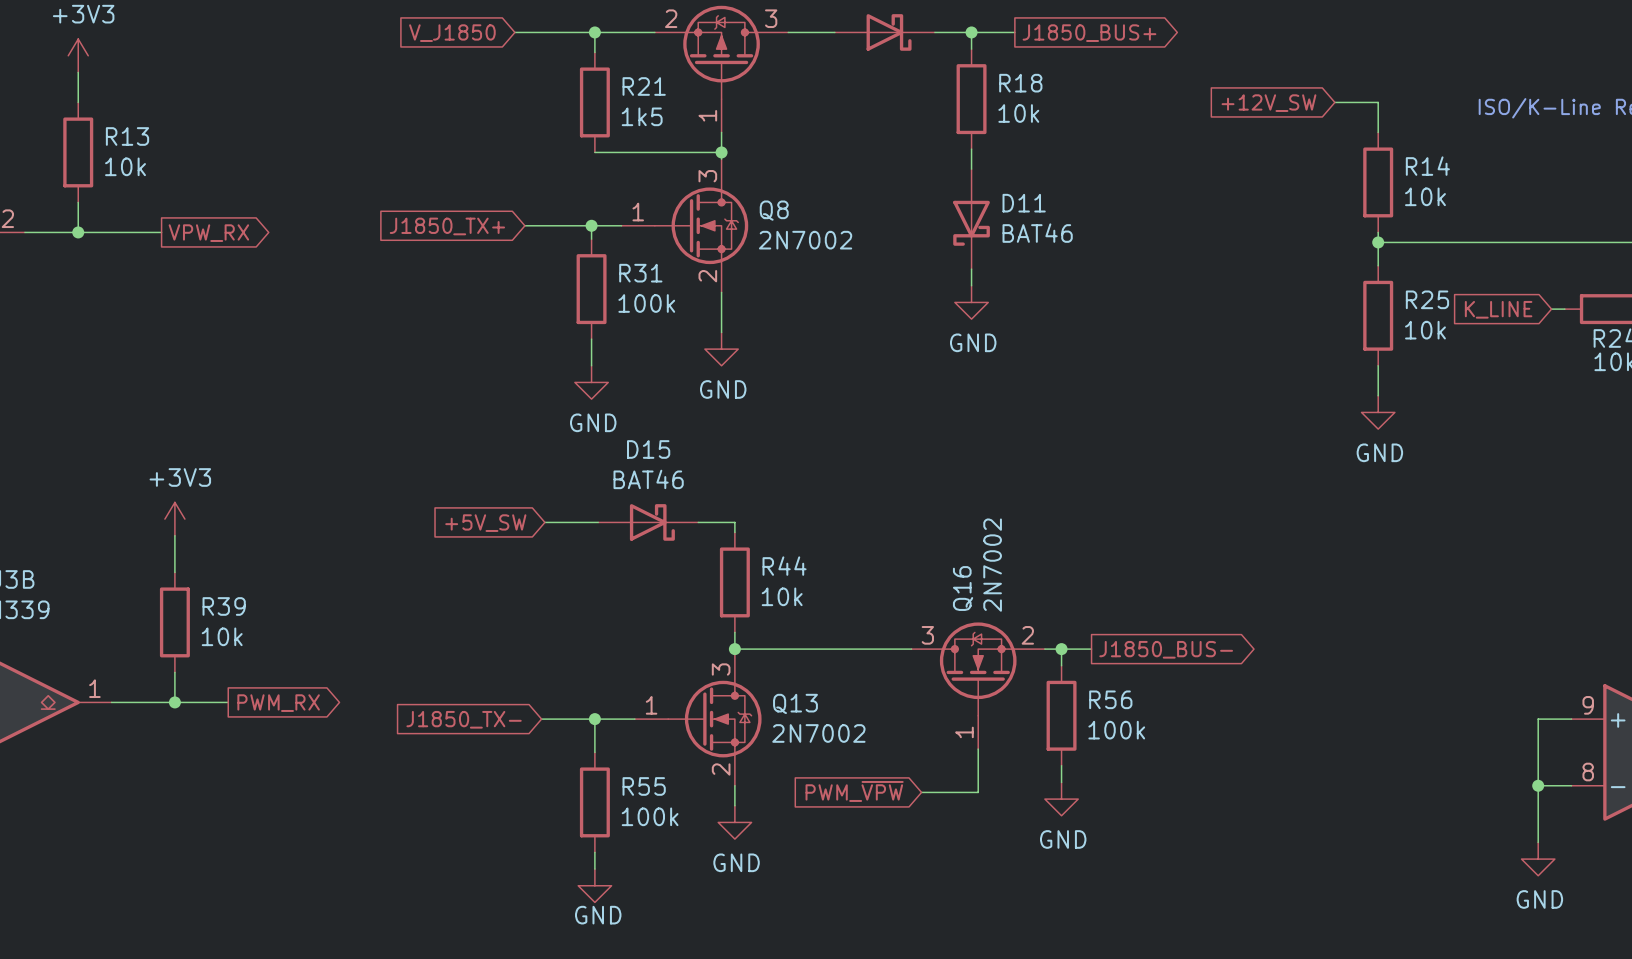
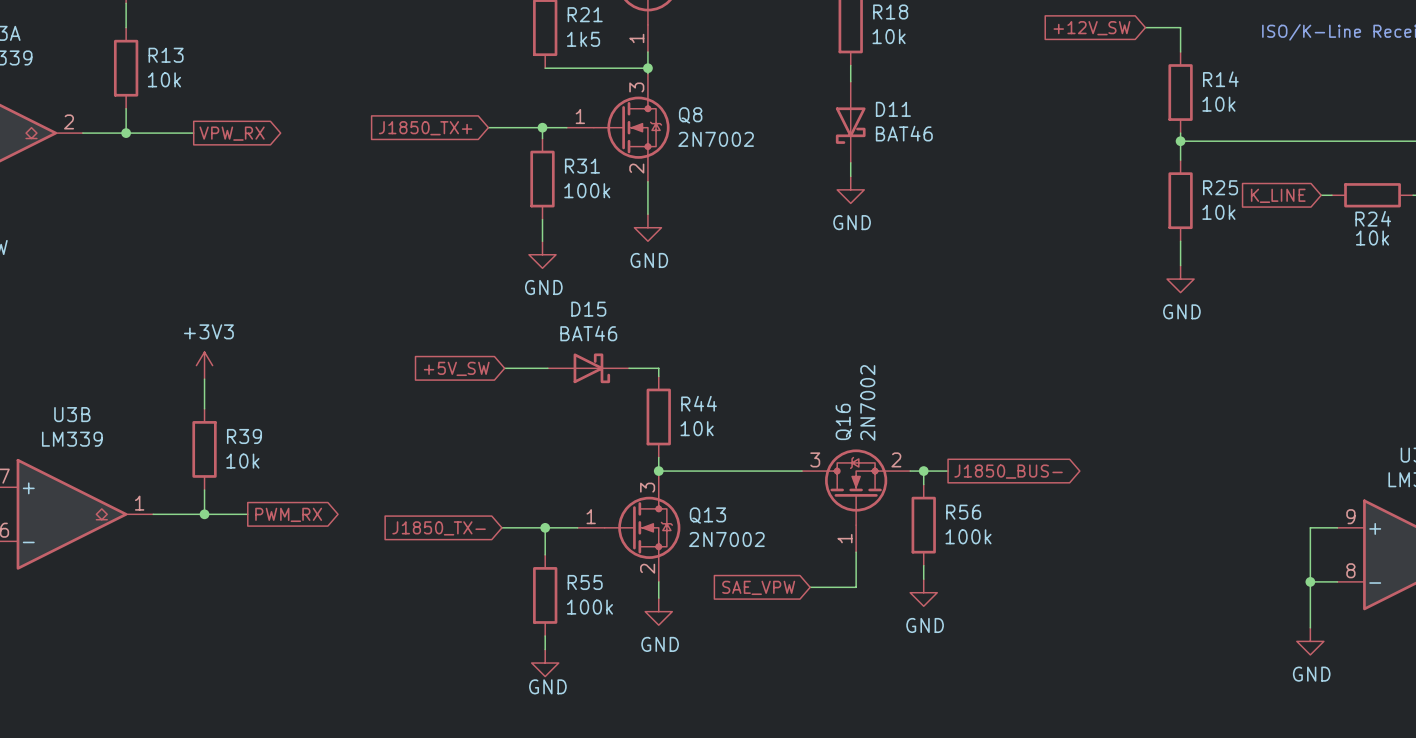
global label: PWM_~{VPW} (854, 791) -> SAE_VPW (758, 587)

